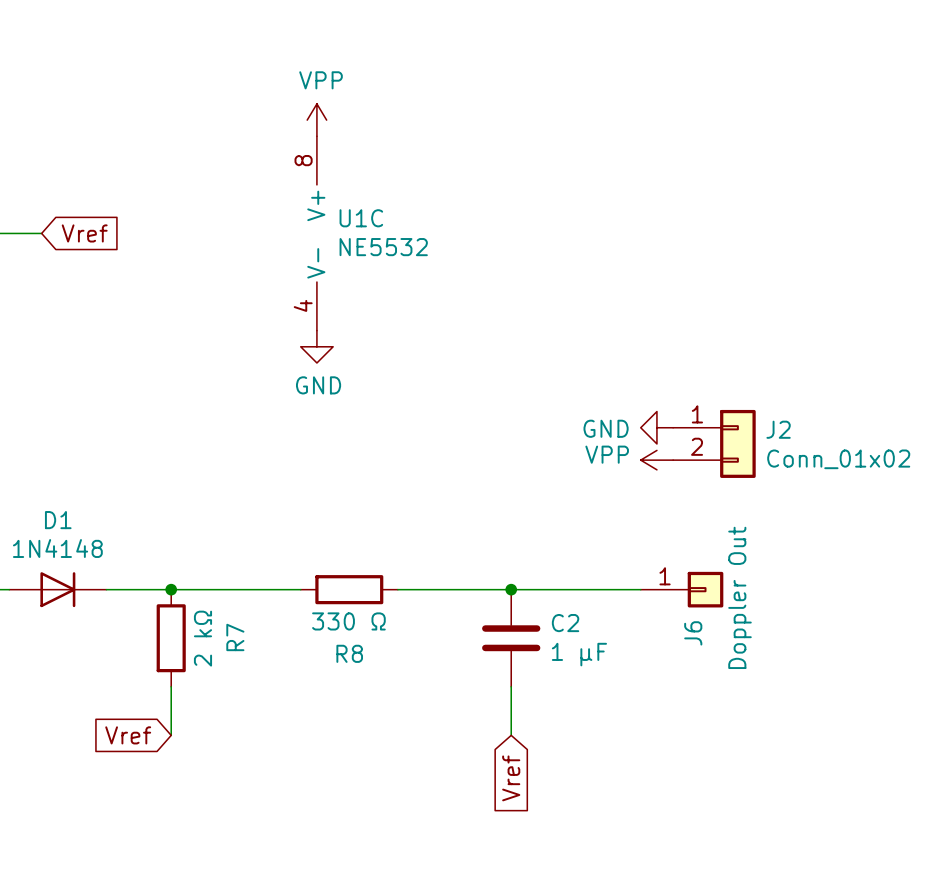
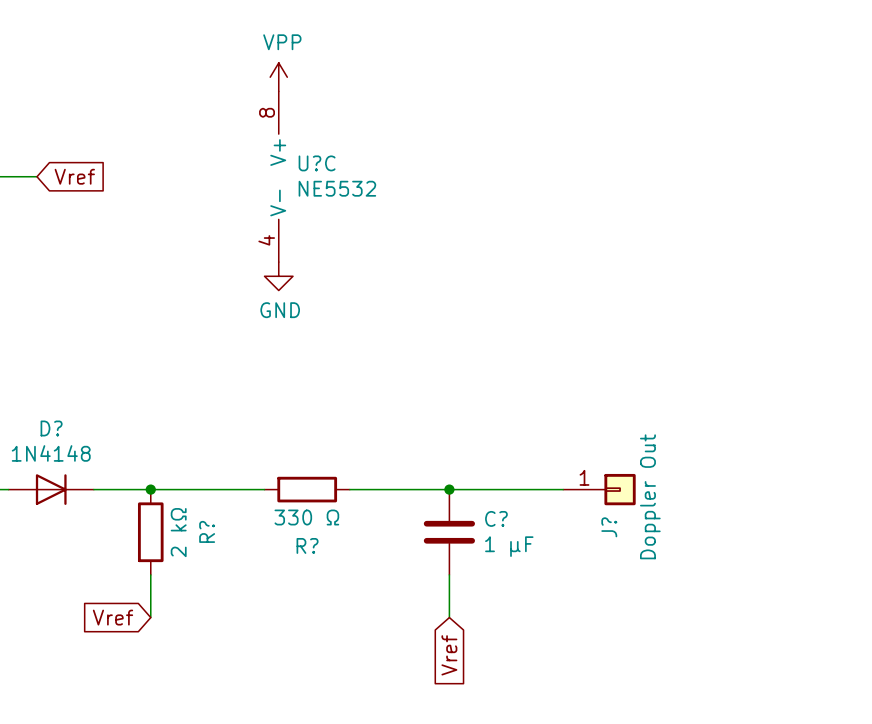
U1C name: U1C (361, 218) -> U?C (317, 163)
power symbol: GND (656, 427) -> none
J2: Conn_01x02 (714, 443) -> none
power symbol: VPP (656, 460) -> none
D1 name: D1 (58, 520) -> D? (51, 428)
C2 name: C2 (565, 623) -> C? (496, 518)
J6 name: J6 (693, 633) -> J? (609, 527)
R7 name: R7 (235, 637) -> R? (207, 531)
R8 name: R8 (349, 653) -> R? (307, 545)

